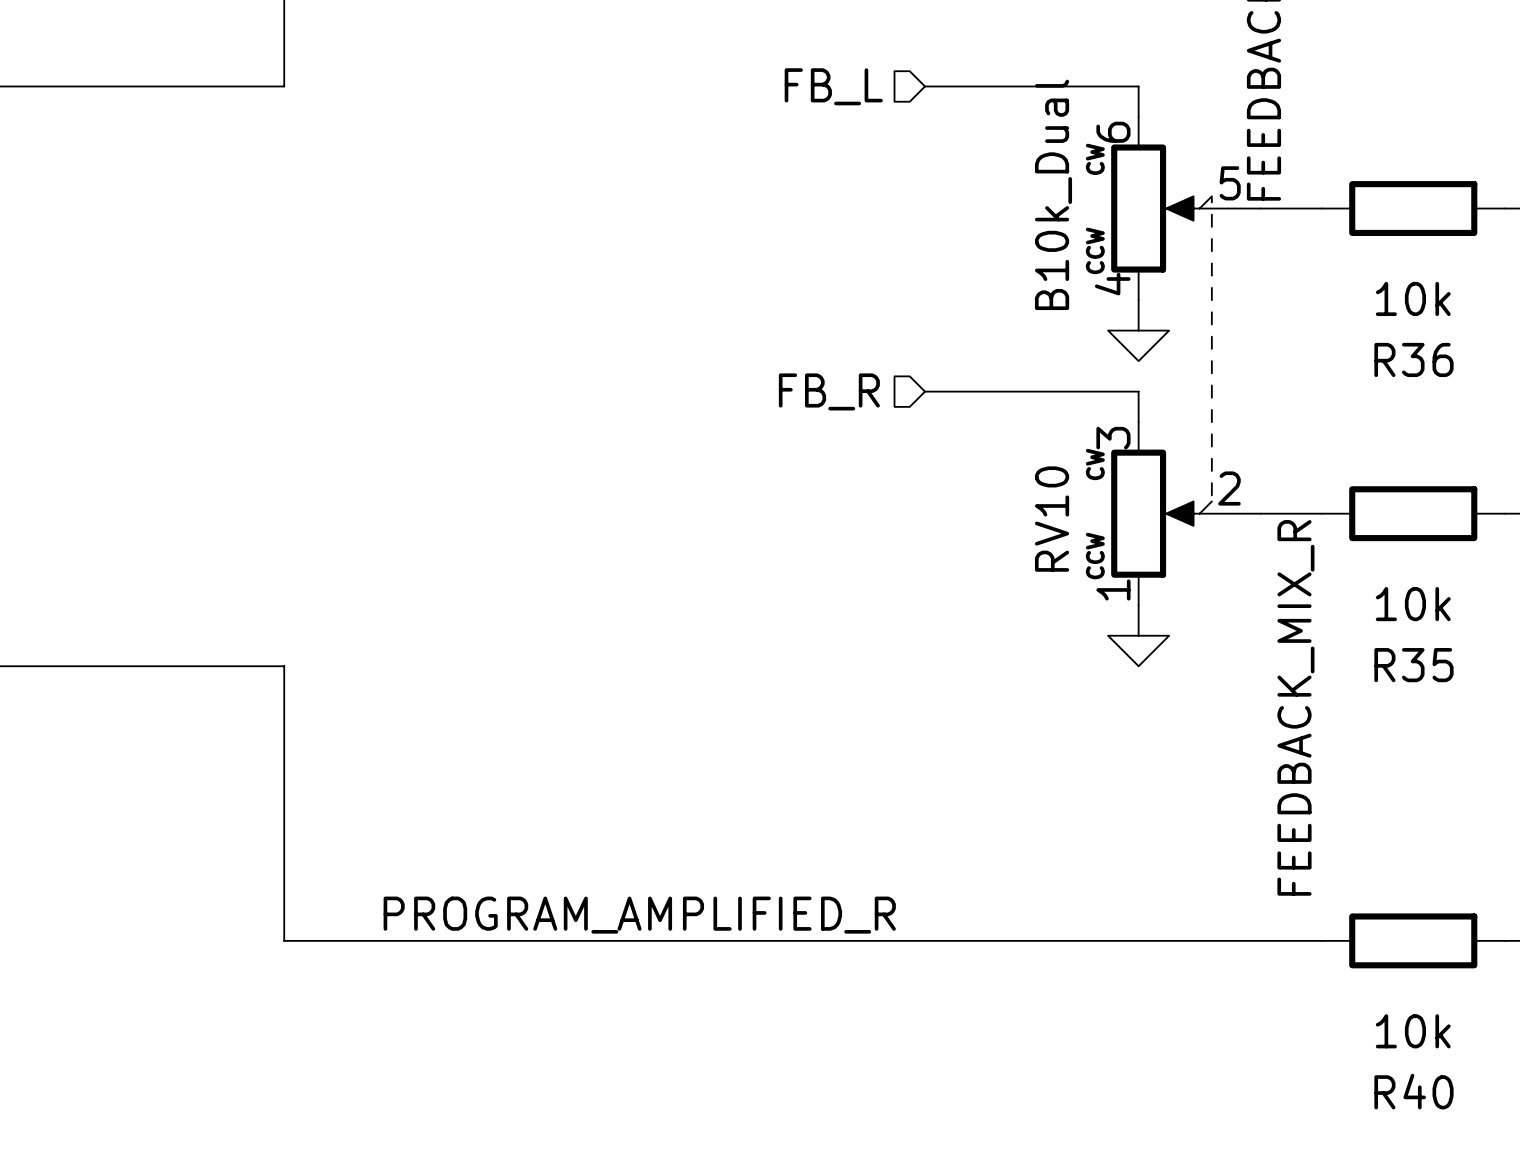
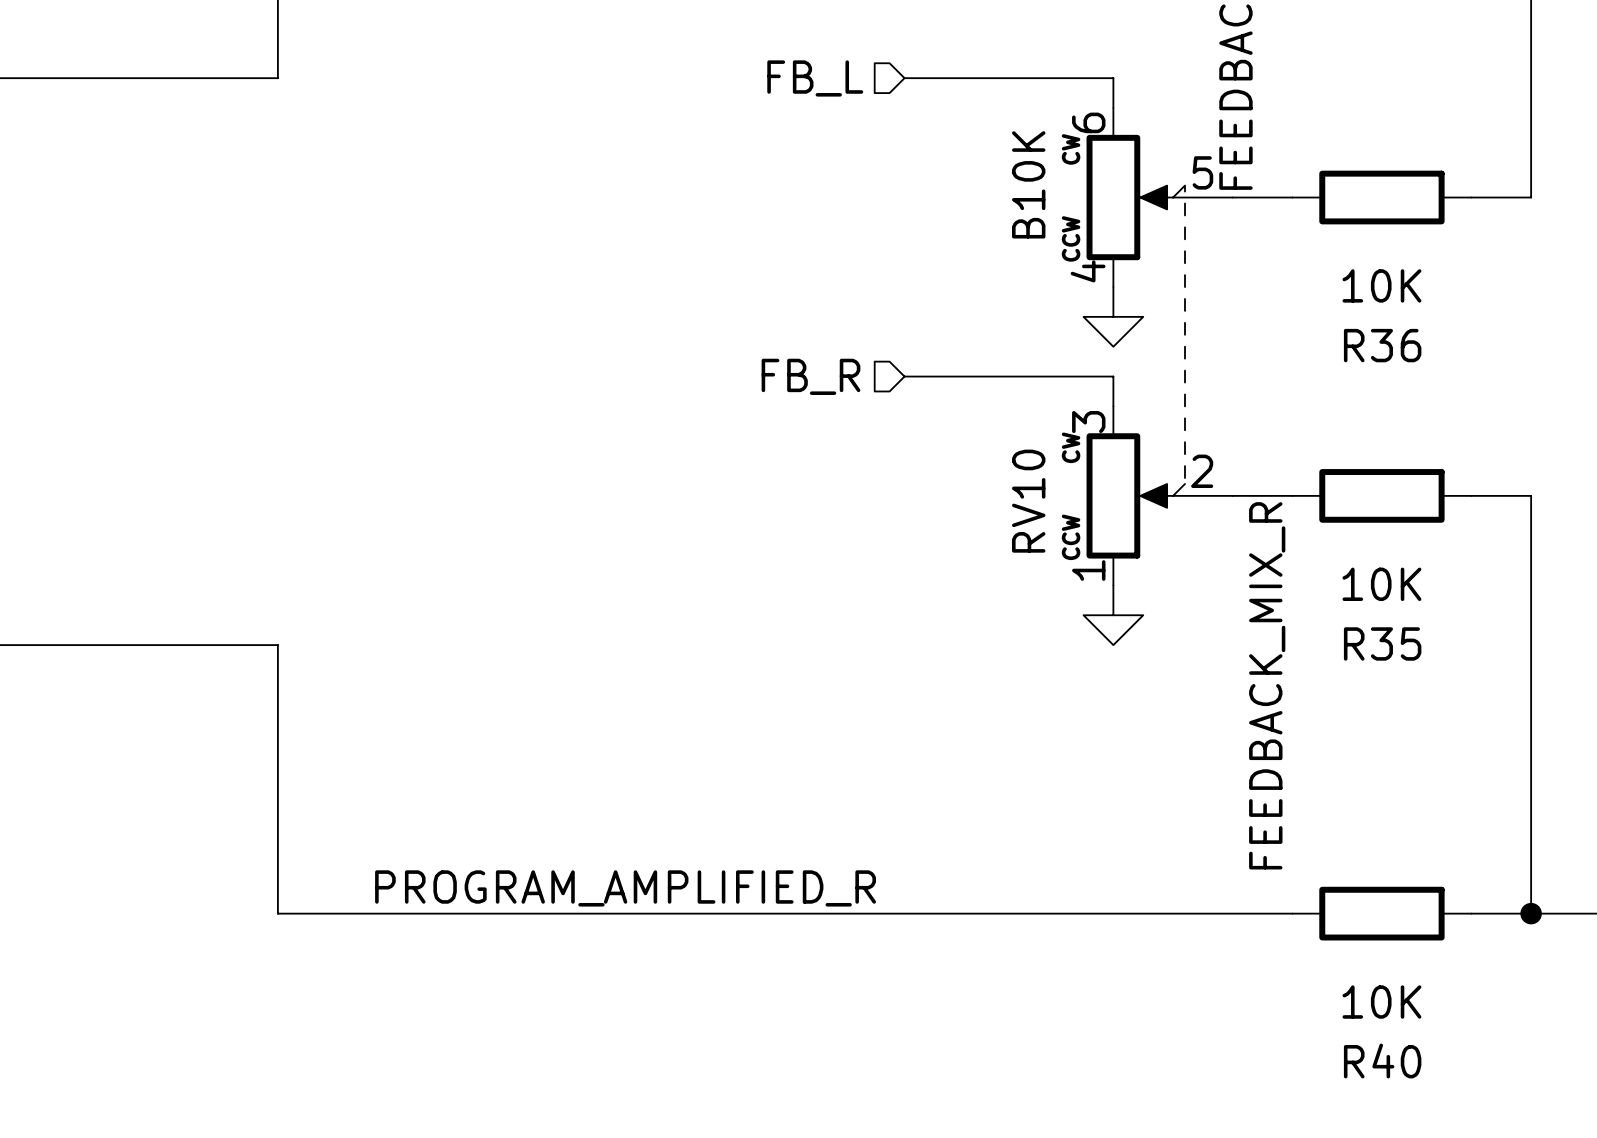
RV10 value: B10k_Dual (1053, 194) -> B10K (1028, 184)
R36 text: 10k (1413, 298) -> 10K (1381, 285)
R35 text: 10k (1413, 604) -> 10K (1381, 584)
R40 text: 10k (1413, 1031) -> 10K (1381, 1002)

